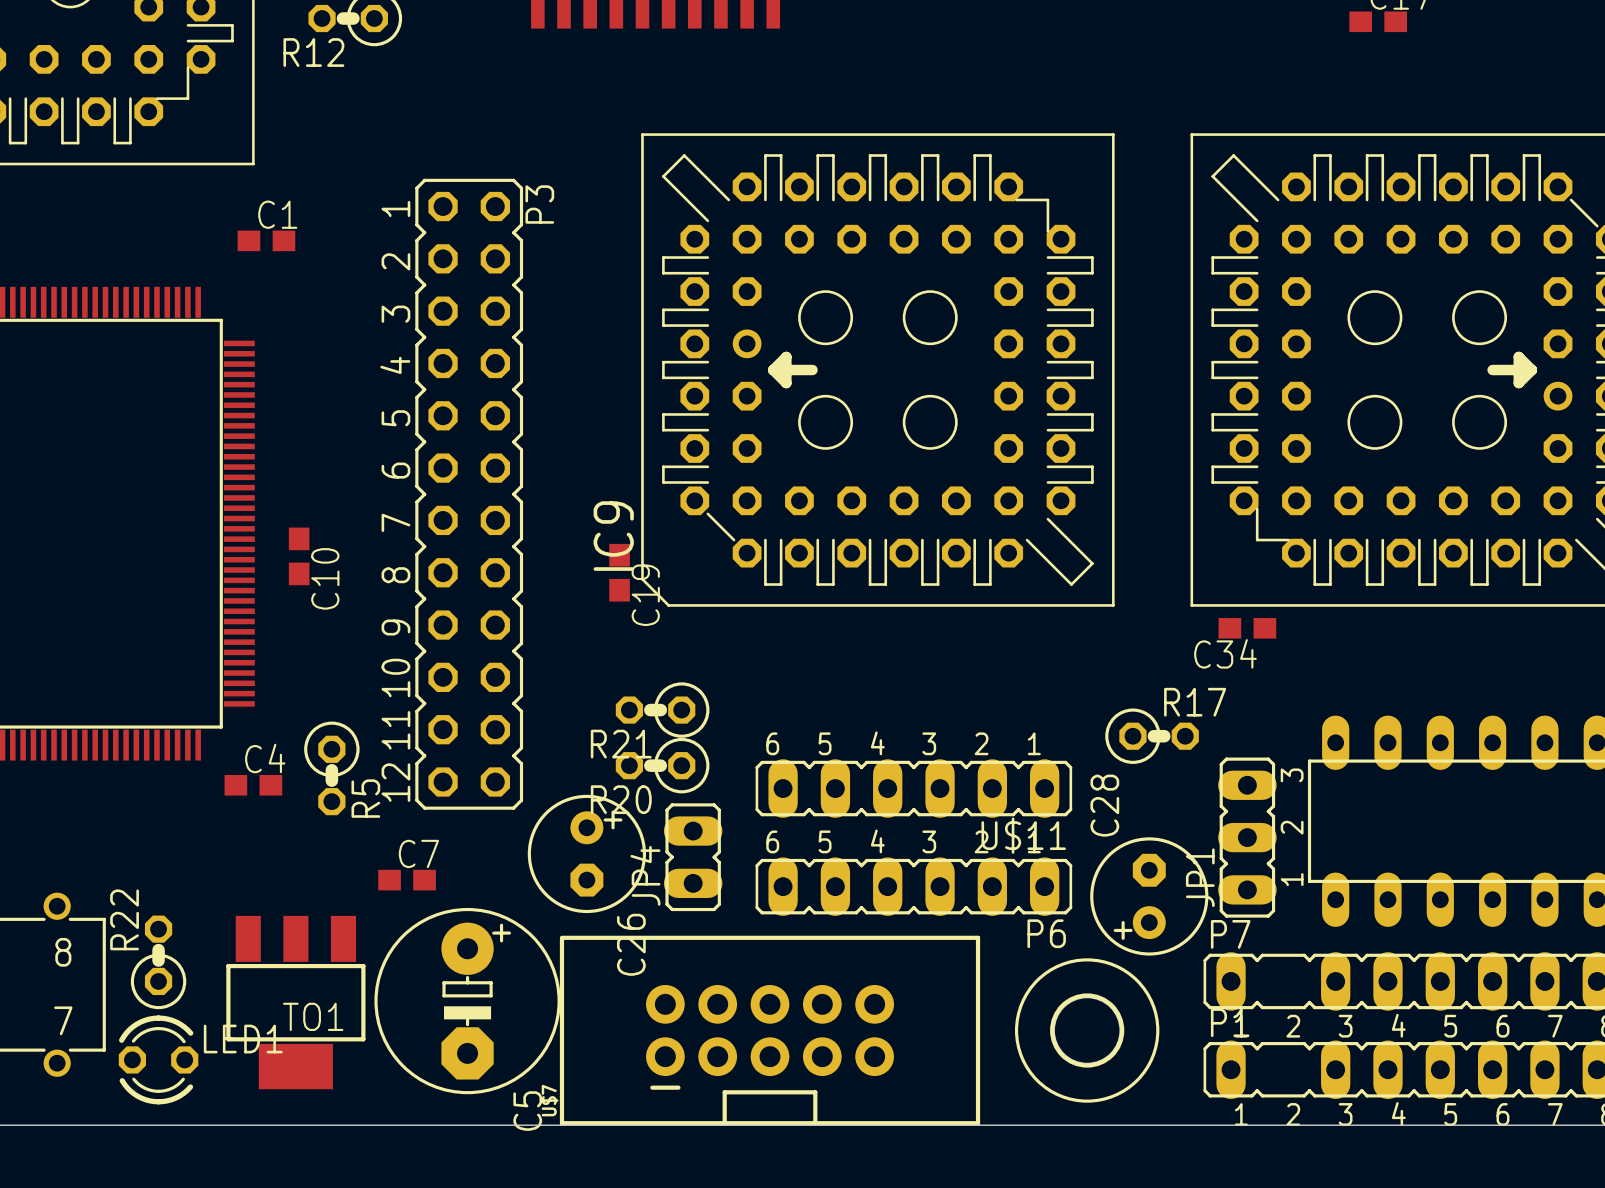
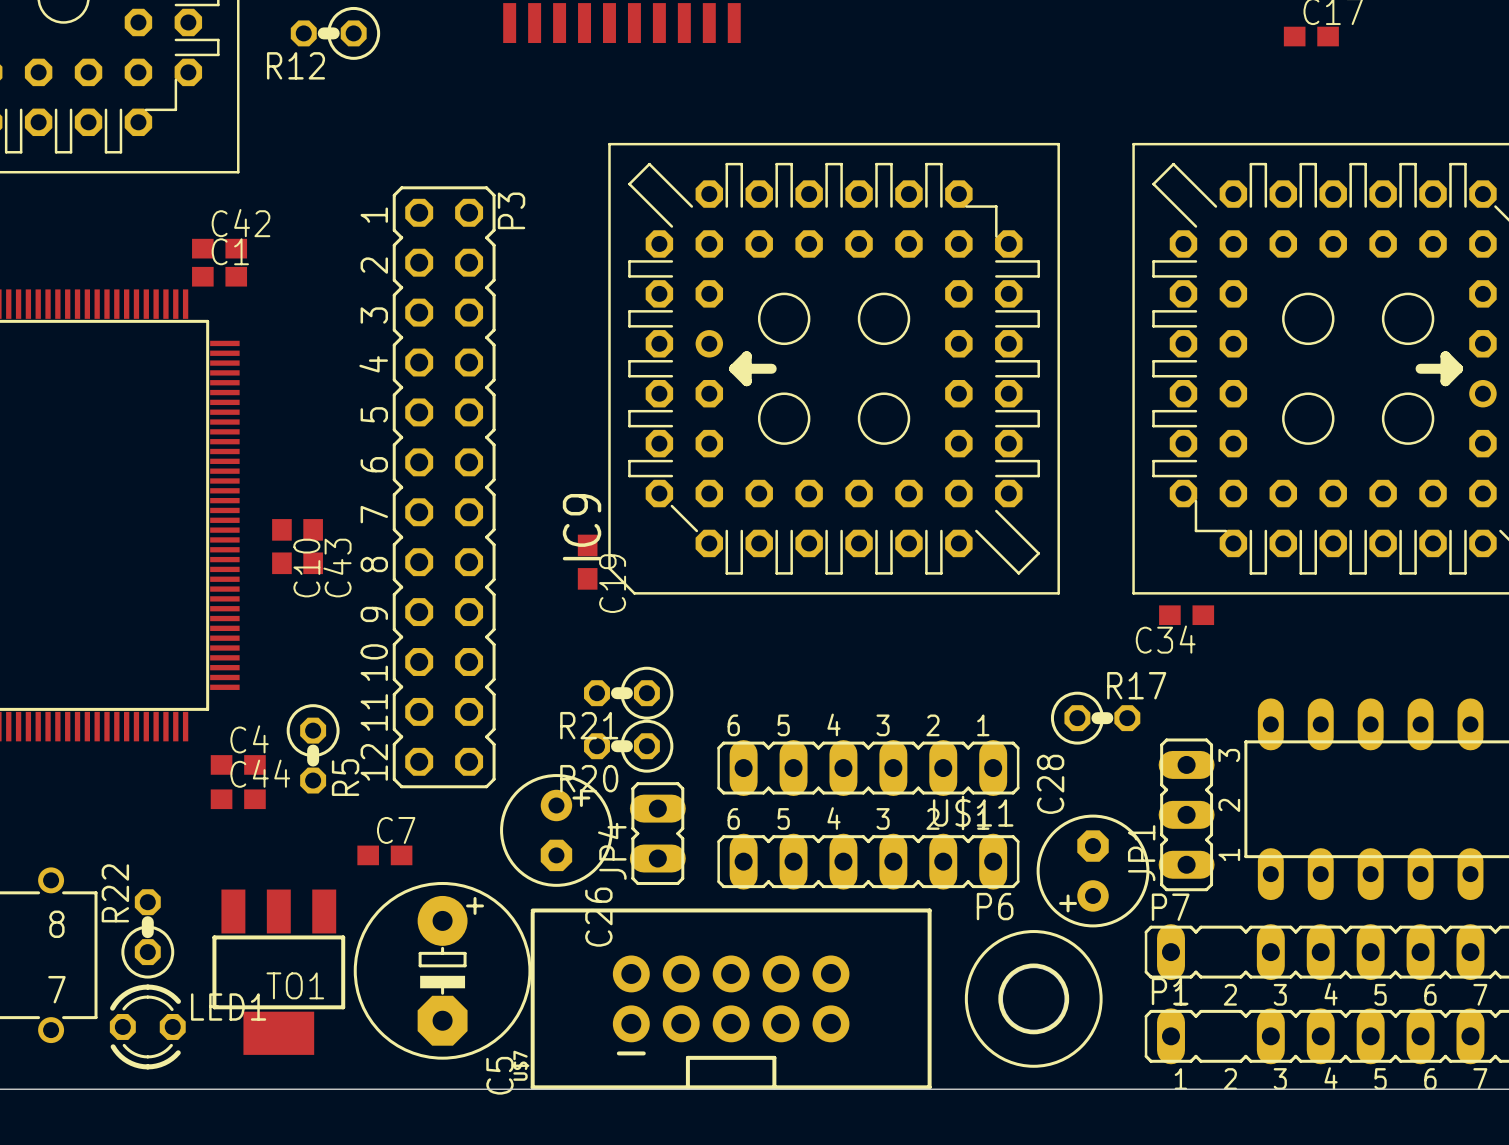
C1 position: (266, 240) -> (219, 276)
C42: none -> (219, 248)
C43: none -> (313, 546)
C44: none -> (238, 799)

